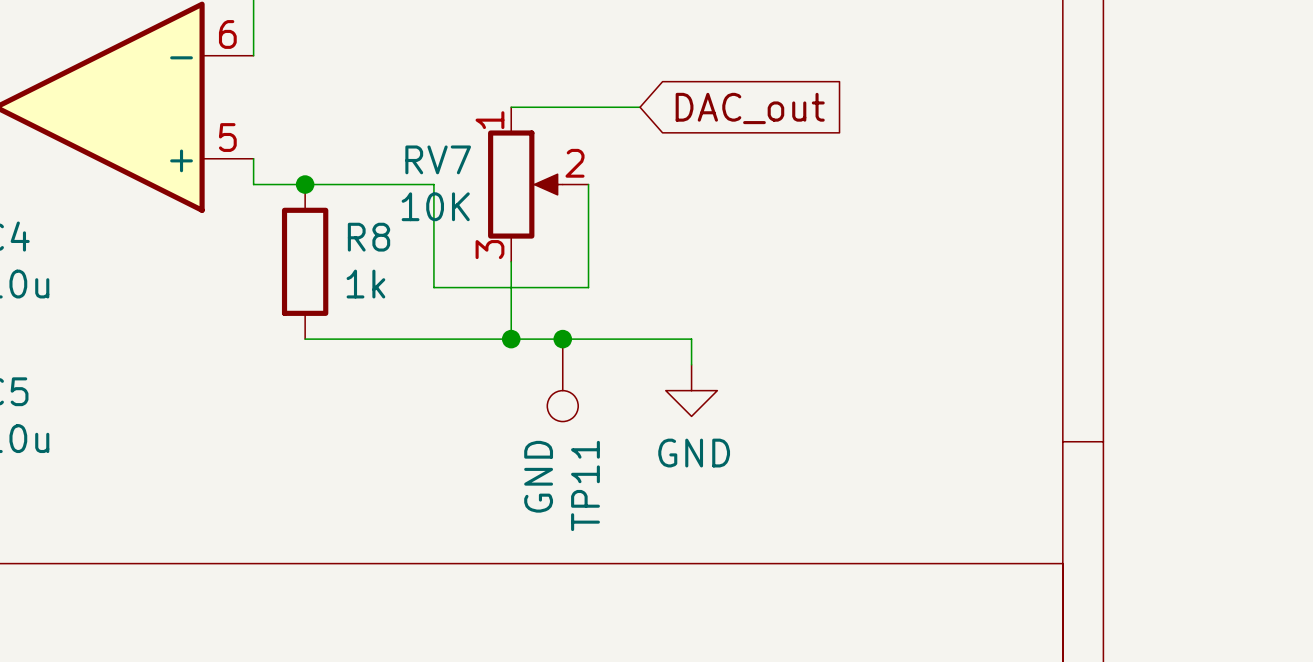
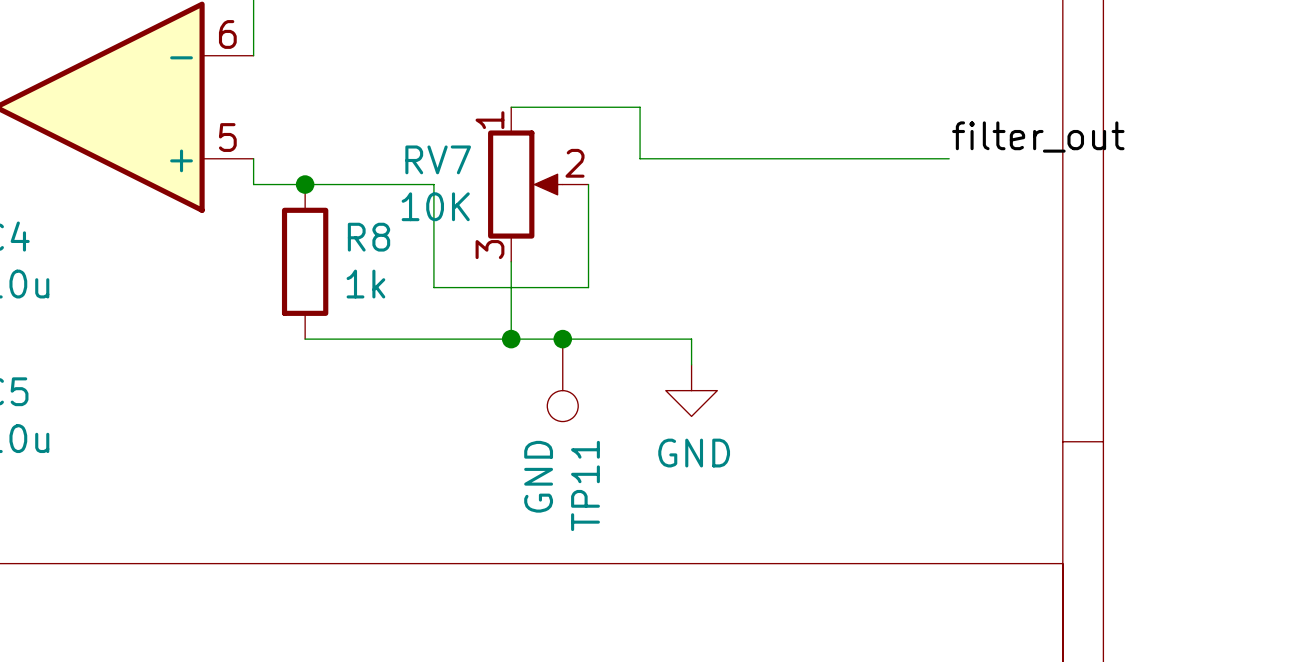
wire: none -> (640, 107) (640, 158) (949, 158)
global label: DAC_out (750, 108) -> none
label: none -> filter_out (1038, 137)

